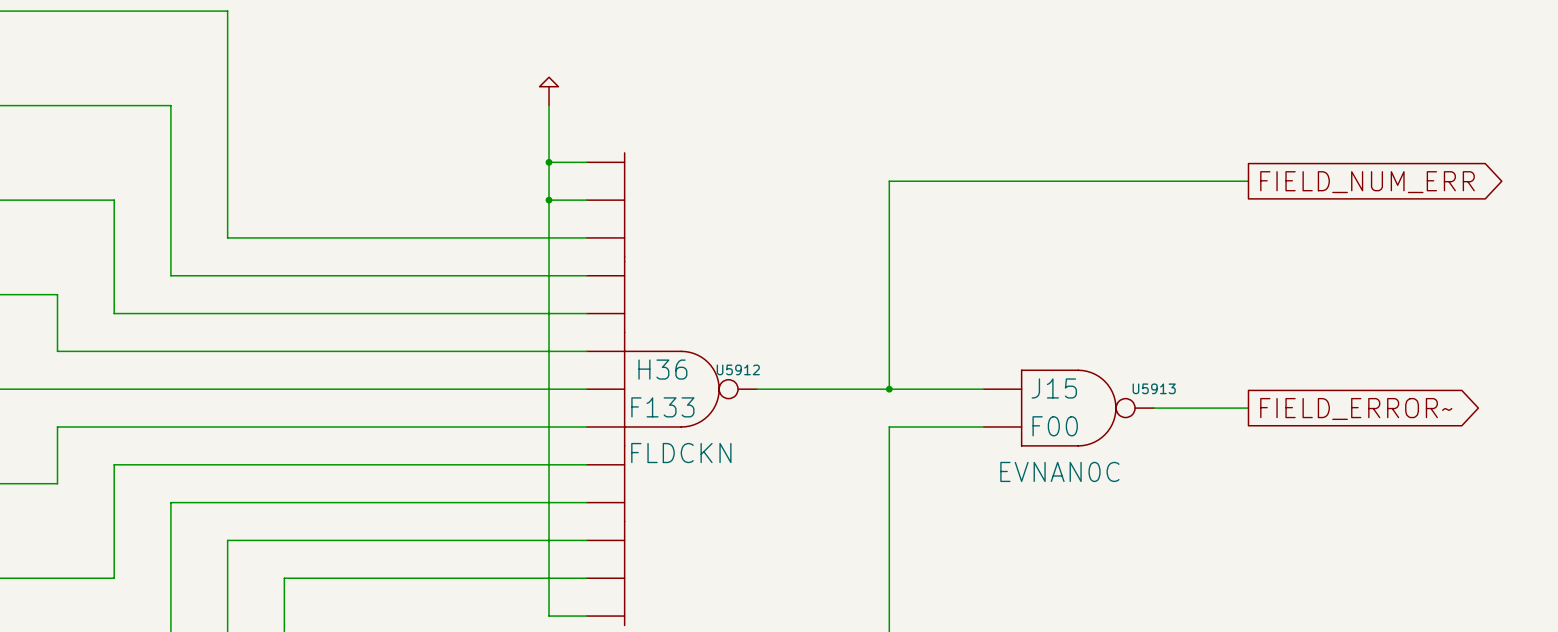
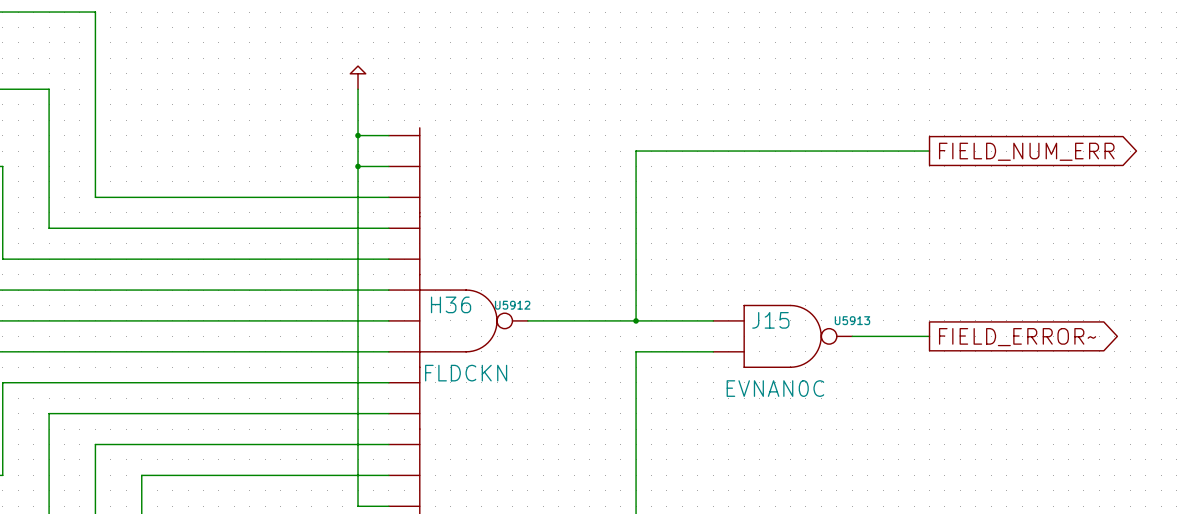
U5912 value: F133 (662, 407) -> none
U5913 value: F00 (1055, 426) -> none

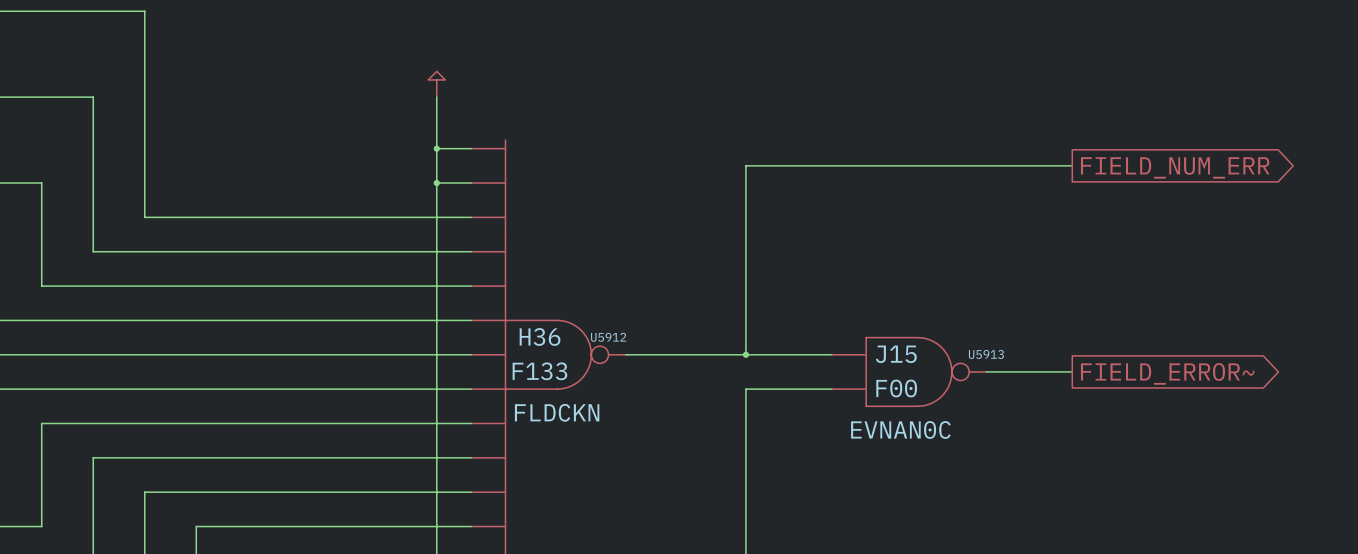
U5912 value: none -> F133 (539, 371)
U5913 value: none -> F00 (896, 388)

